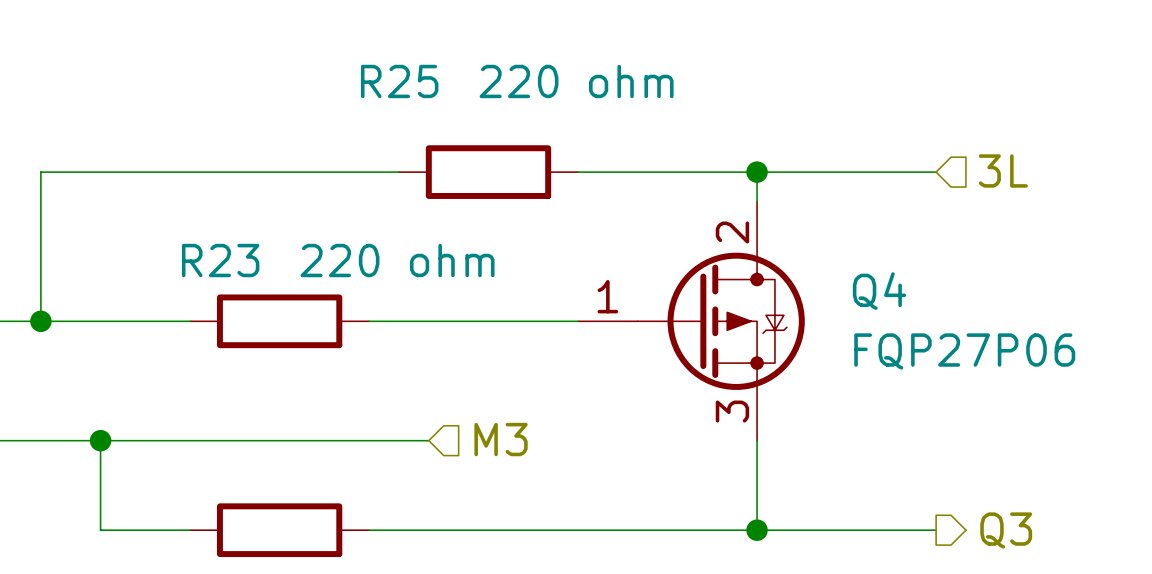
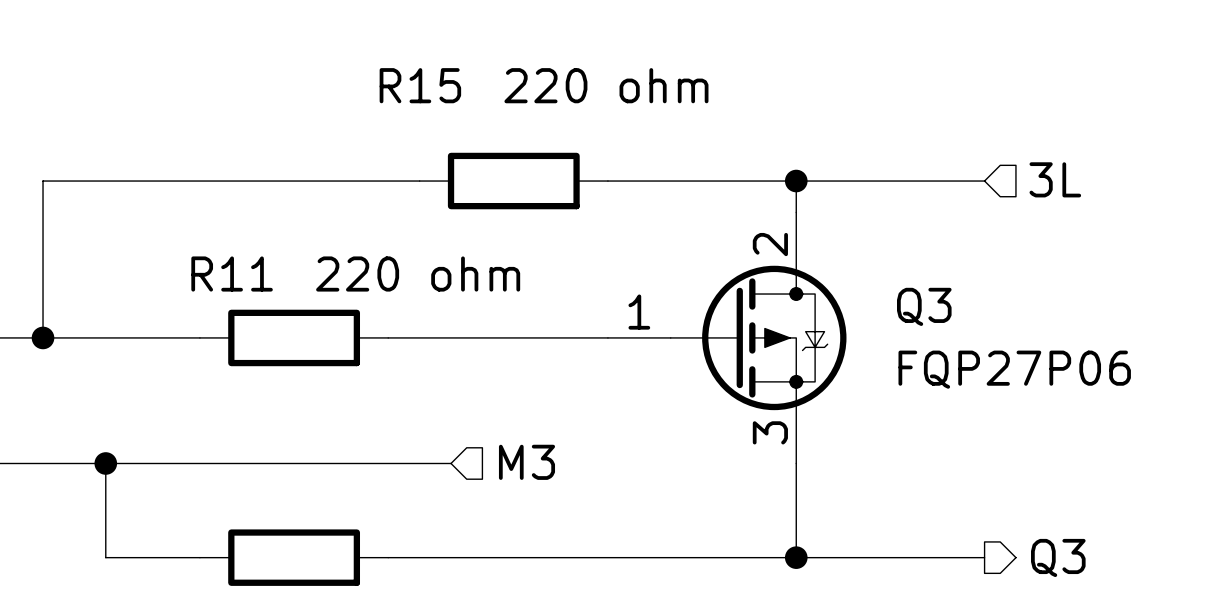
R25 name: R25 (399, 81) -> R15 (420, 85)
R23 name: R23 (220, 260) -> R11 (232, 274)
Q4 name: Q4 (879, 291) -> Q3 (924, 306)

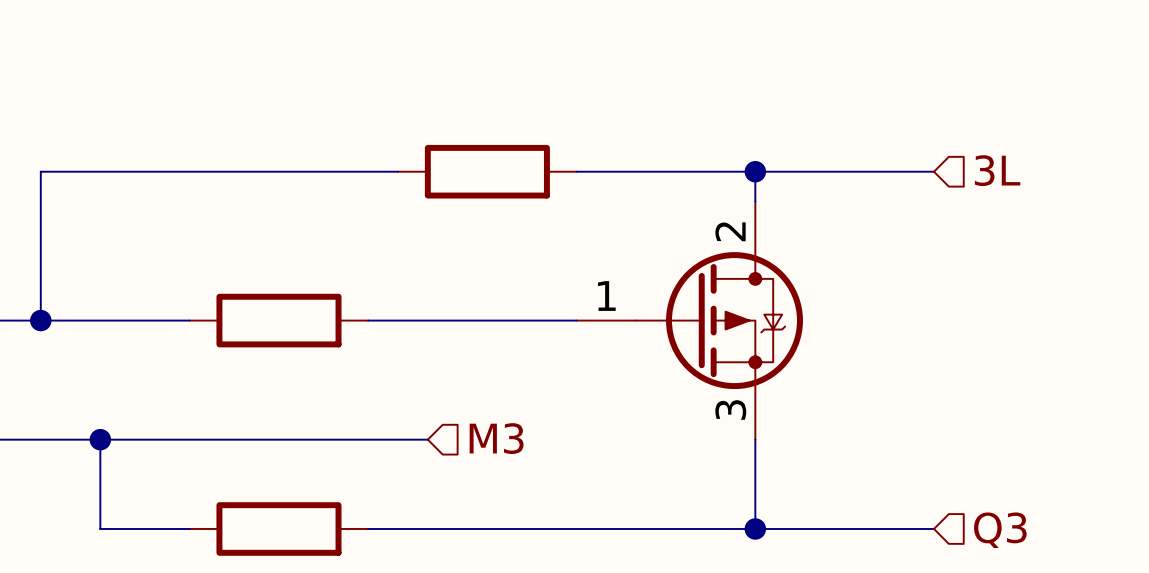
R15 name: R15 (420, 85) -> none
R15 value: 220 ohm (606, 85) -> none
R11 name: R11 (232, 274) -> none
R11 value: 220 ohm (418, 274) -> none
Q3 name: Q3 (924, 306) -> none
Q3 value: FQP27P06 (1014, 369) -> none
hierarchical label shape: output (1058, 557) -> input (1000, 530)

